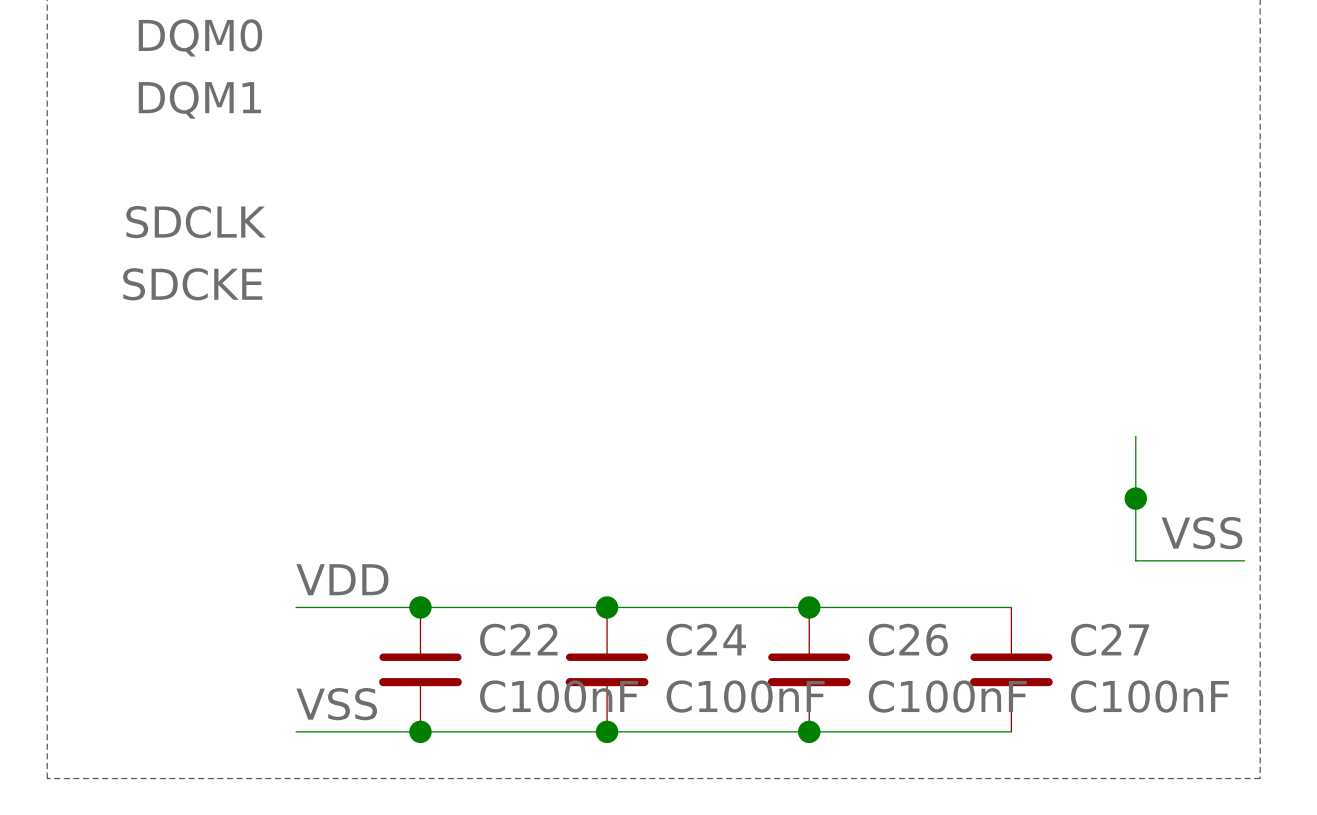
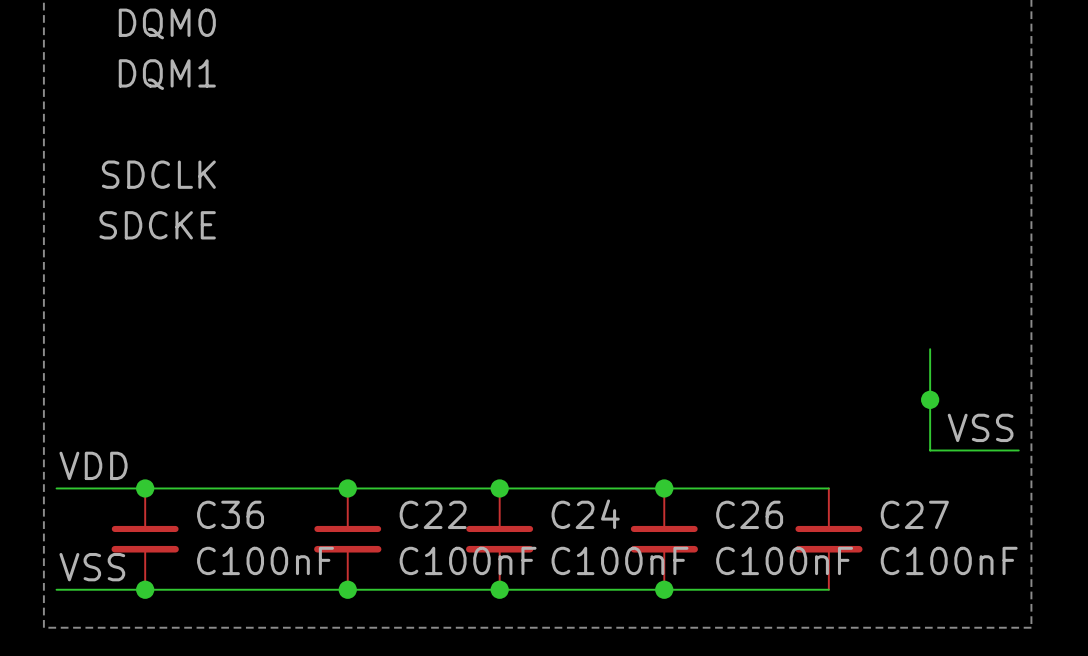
label position: VDD (342, 579) -> VDD (93, 465)
wire: none -> (56, 488) (246, 488)
junction: none -> (145, 488)
C36: none -> C100nF (145, 539)
label position: VSS (336, 704) -> VSS (92, 567)
wire: none -> (56, 589) (246, 589)
junction: none -> (145, 589)

